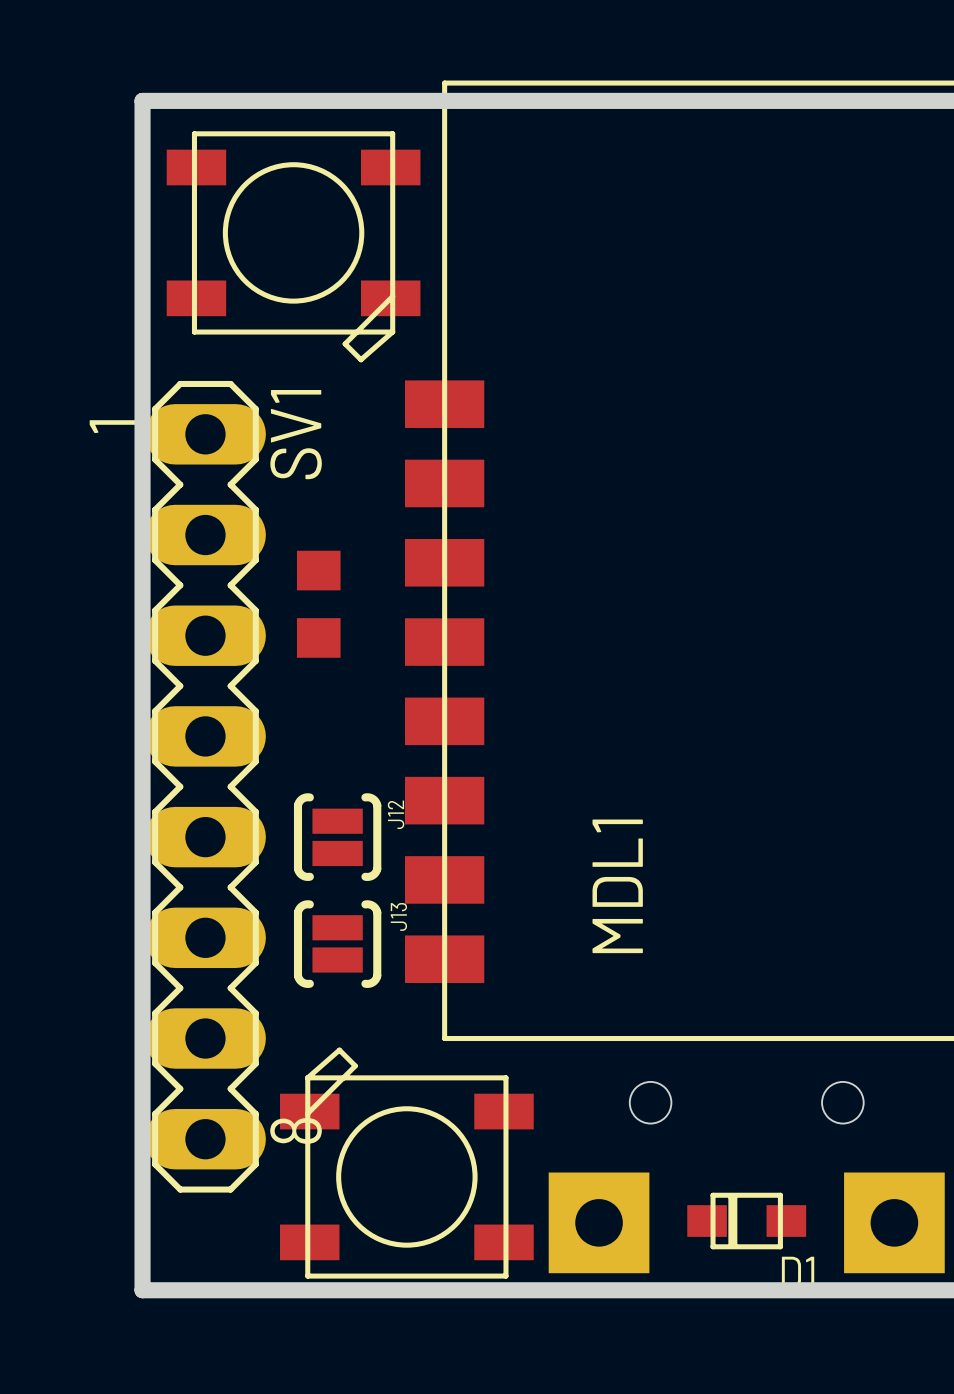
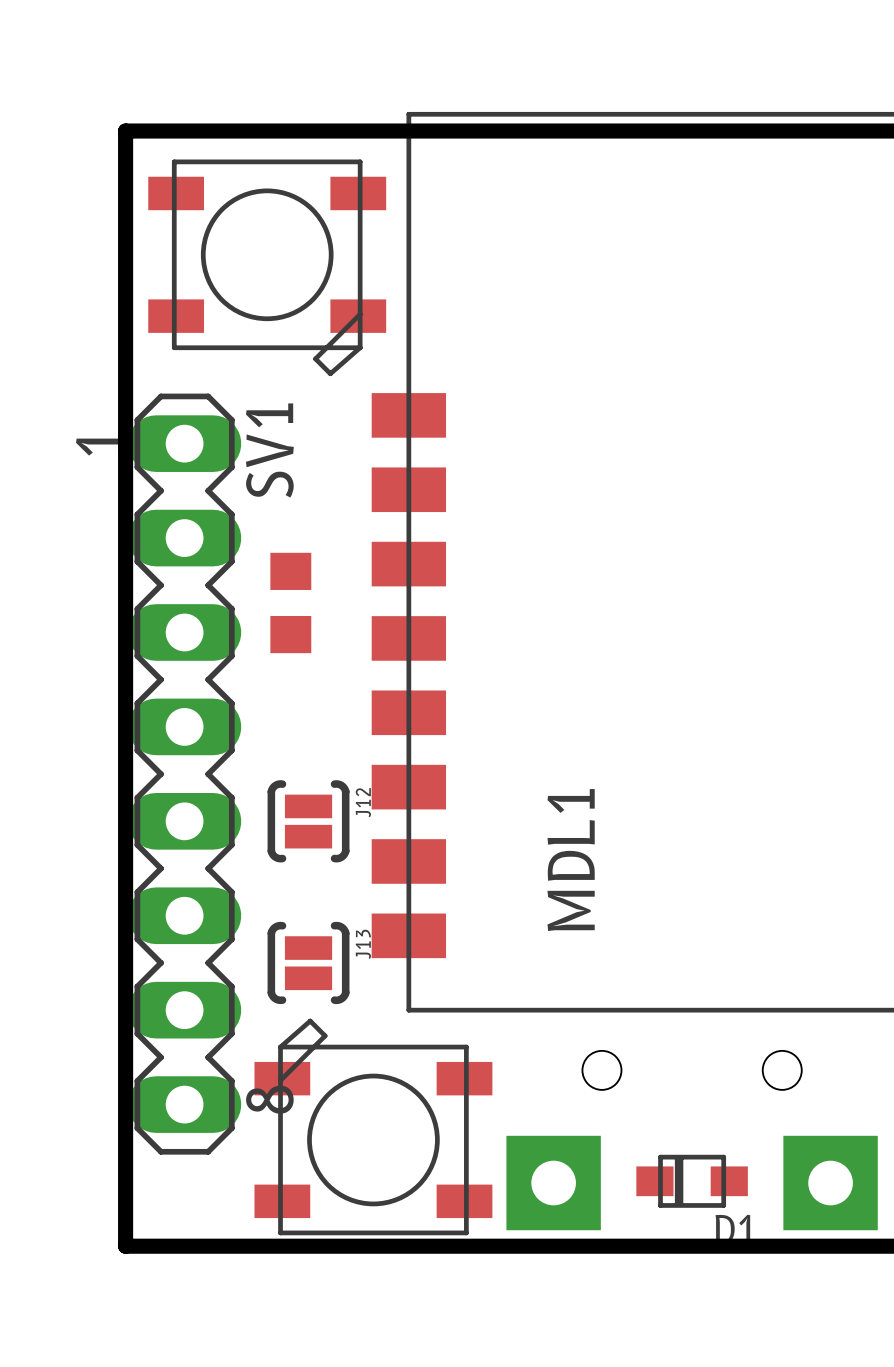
J13 name position: J13 (398, 916) -> J13 (363, 944)
J13 position: (337, 944) -> (308, 962)

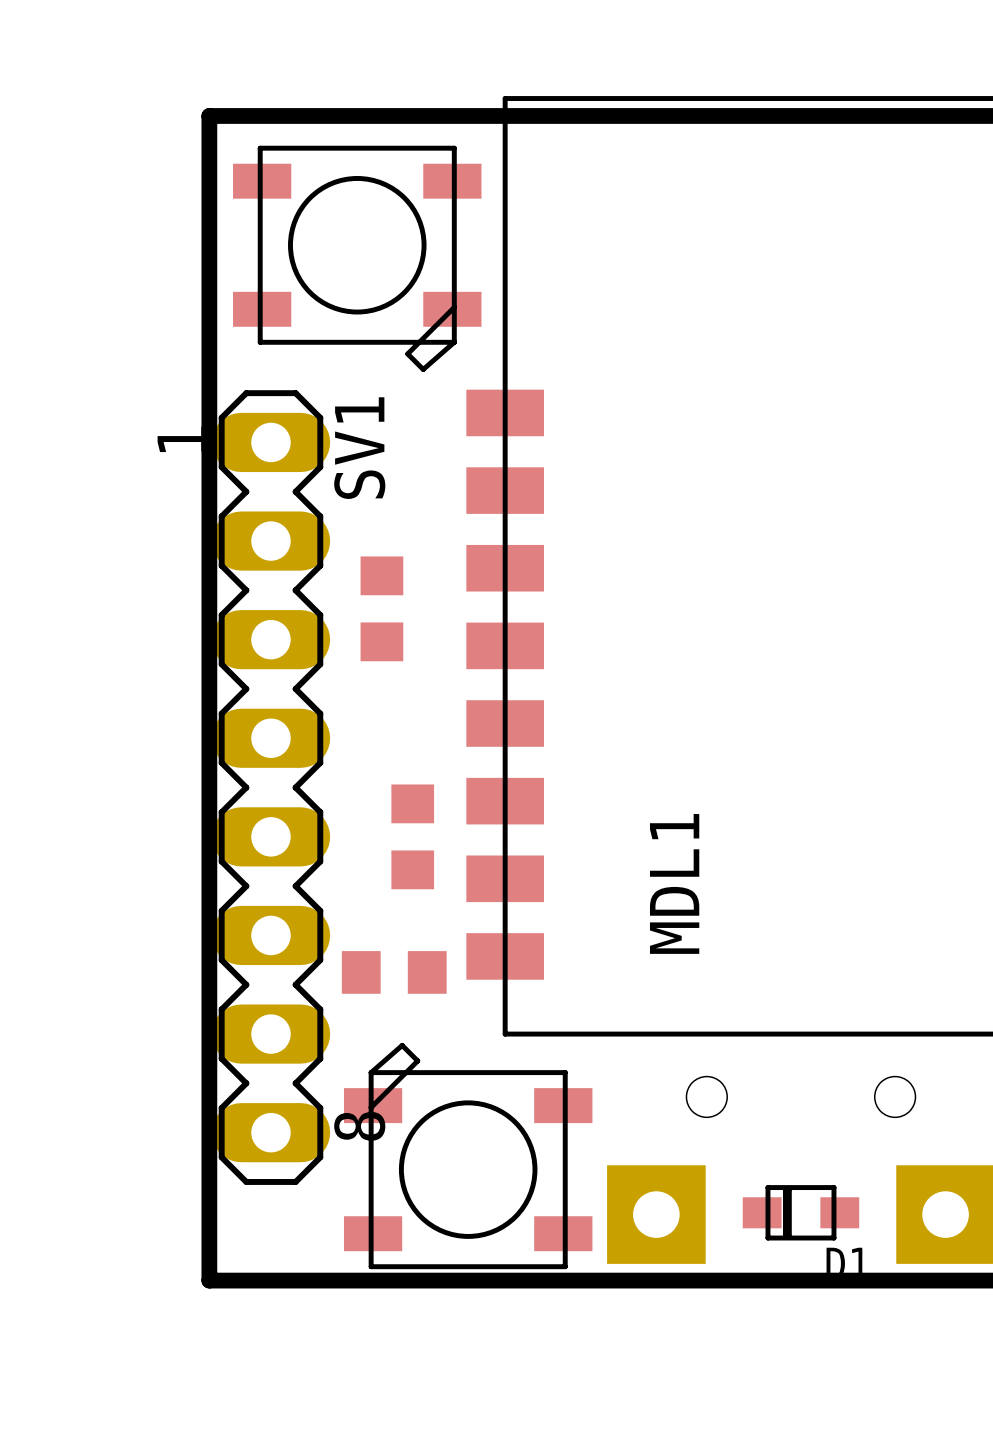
J12: (308, 821) -> none
part: none -> (412, 836)
part: none -> (394, 972)
J13: (308, 962) -> none

